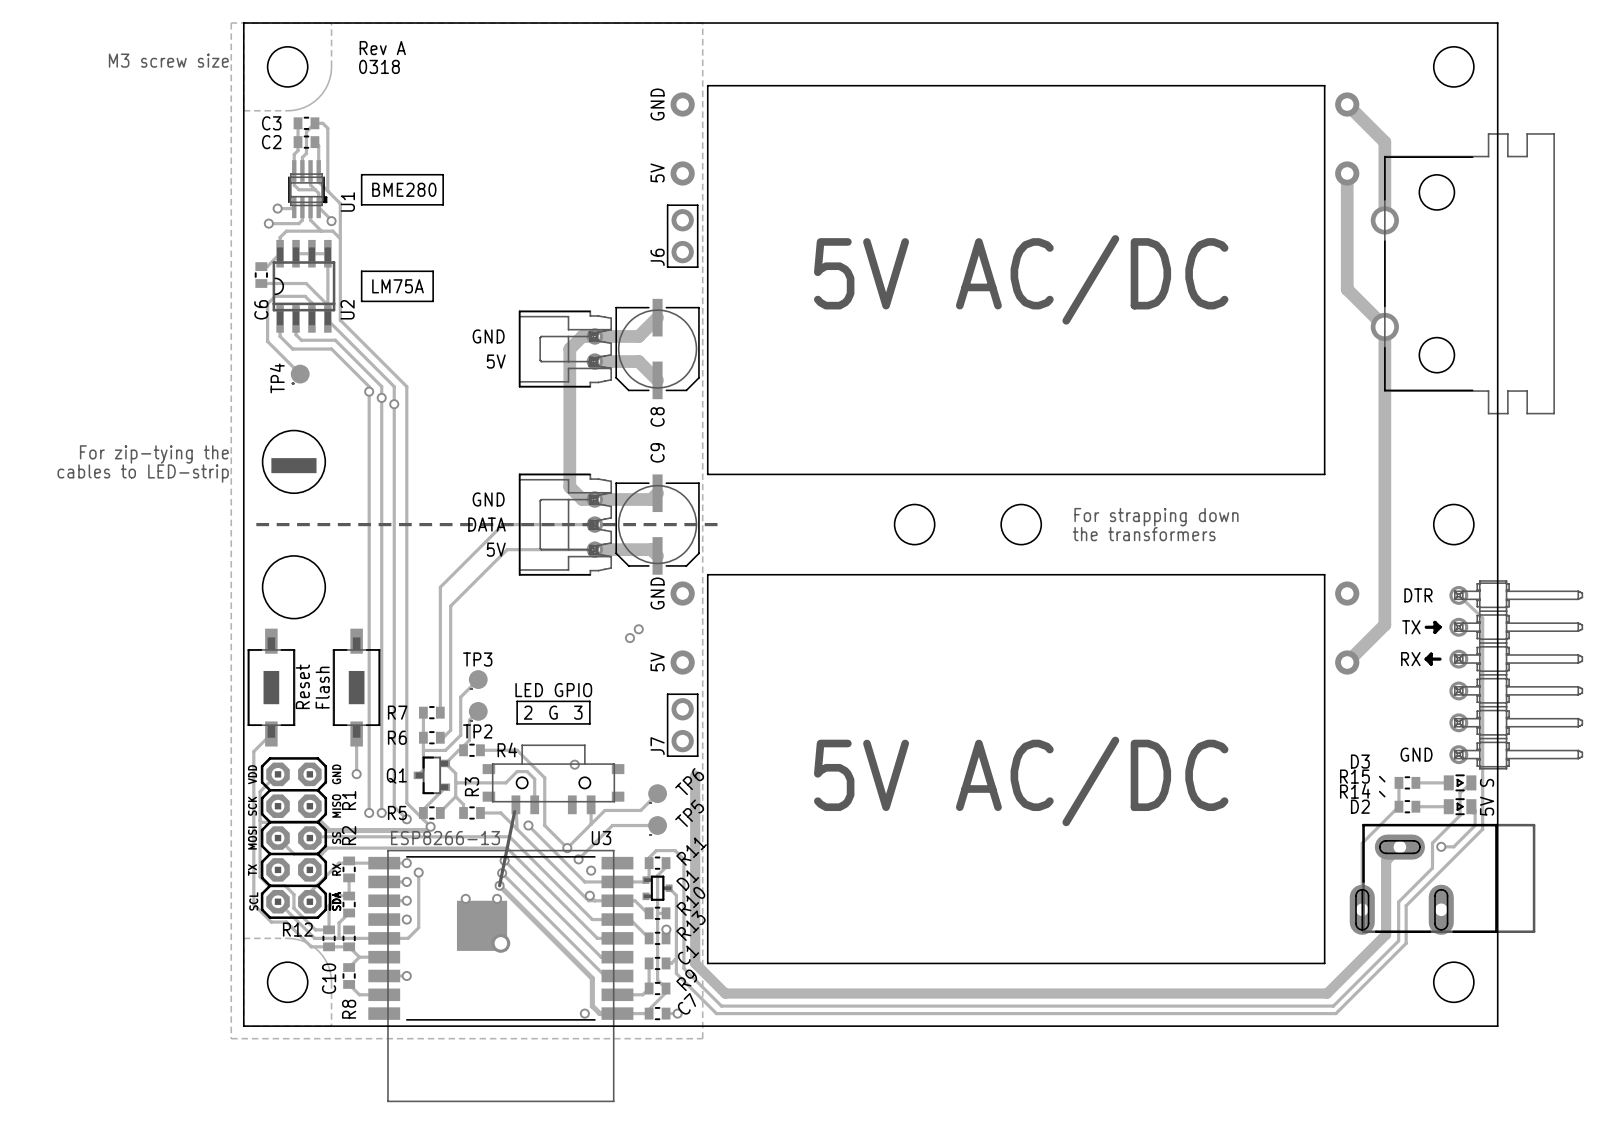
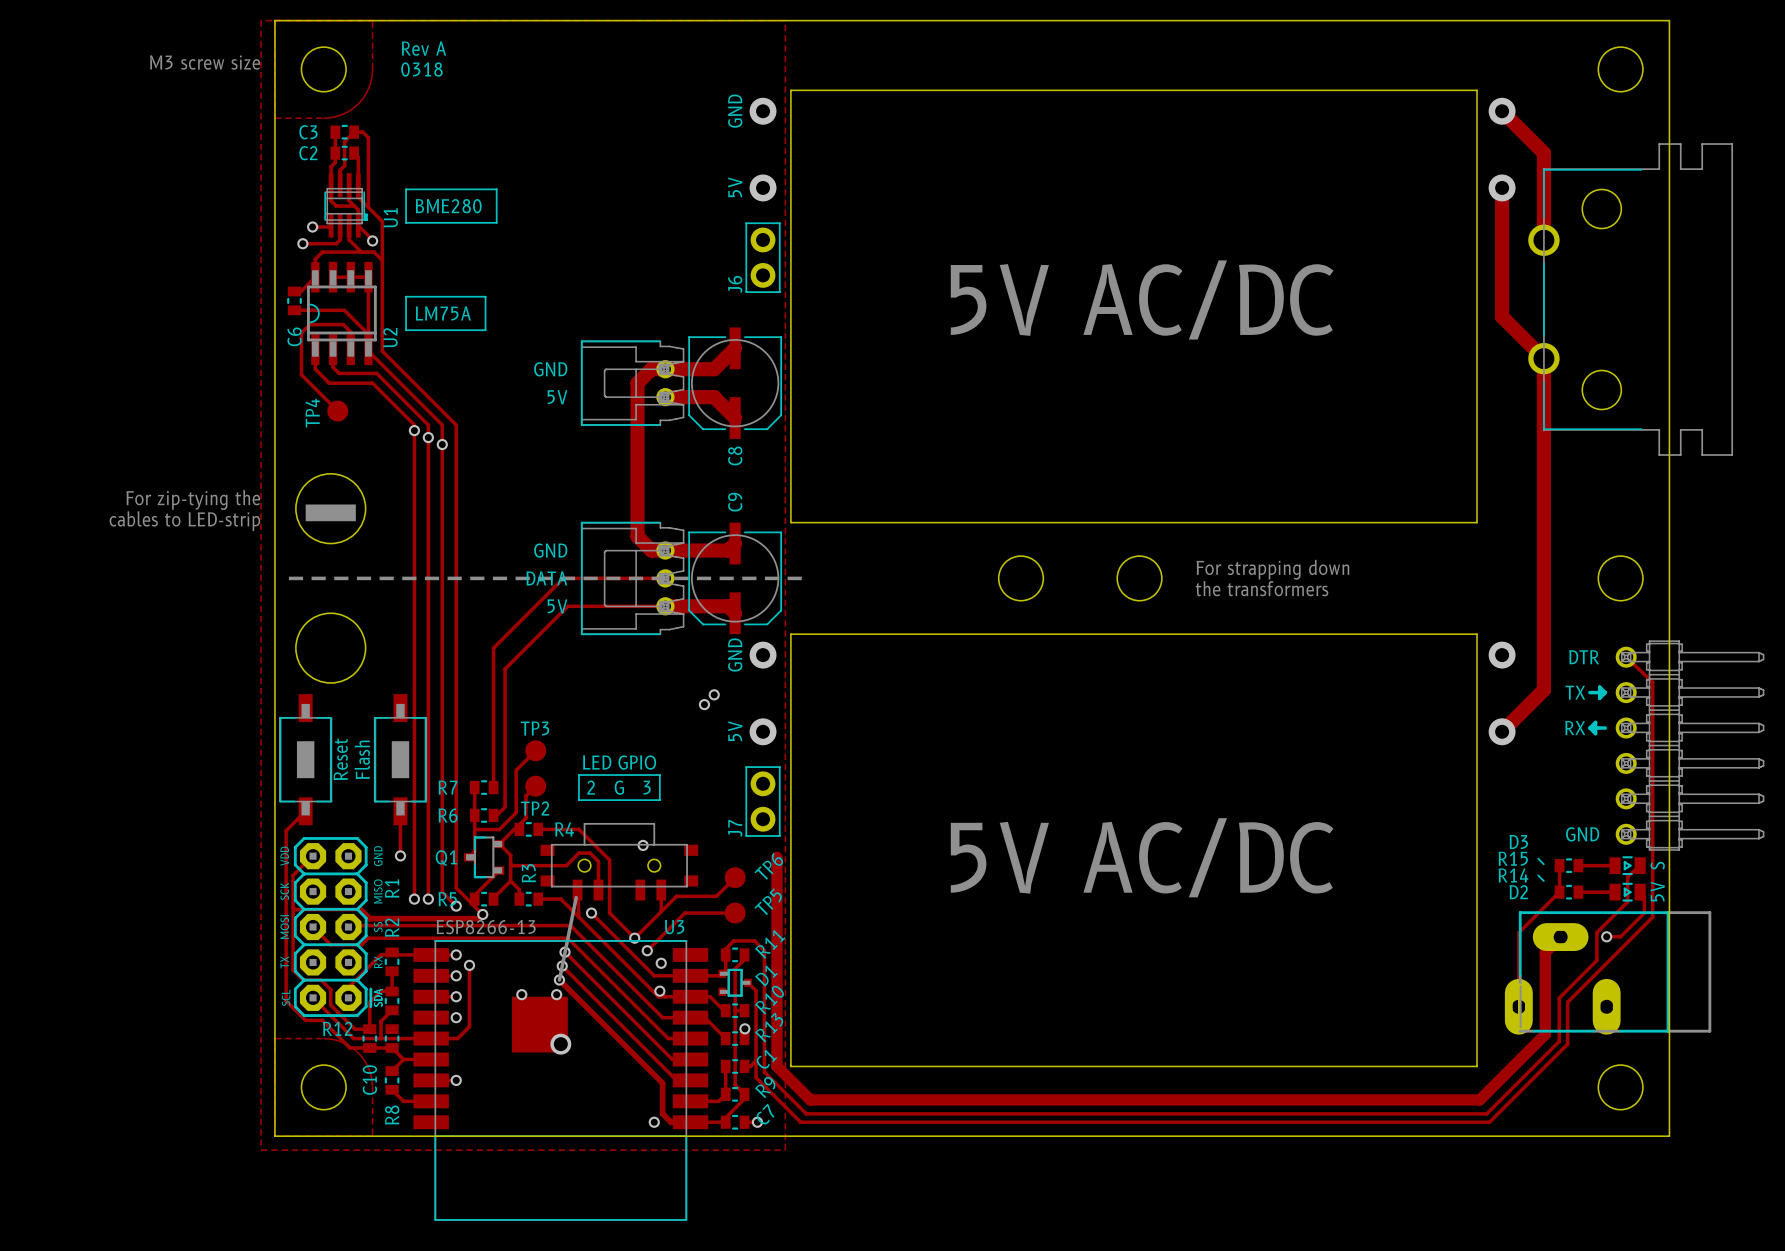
U3 footprint: [368, 849, 634, 1103] -> [413, 940, 709, 1221]

